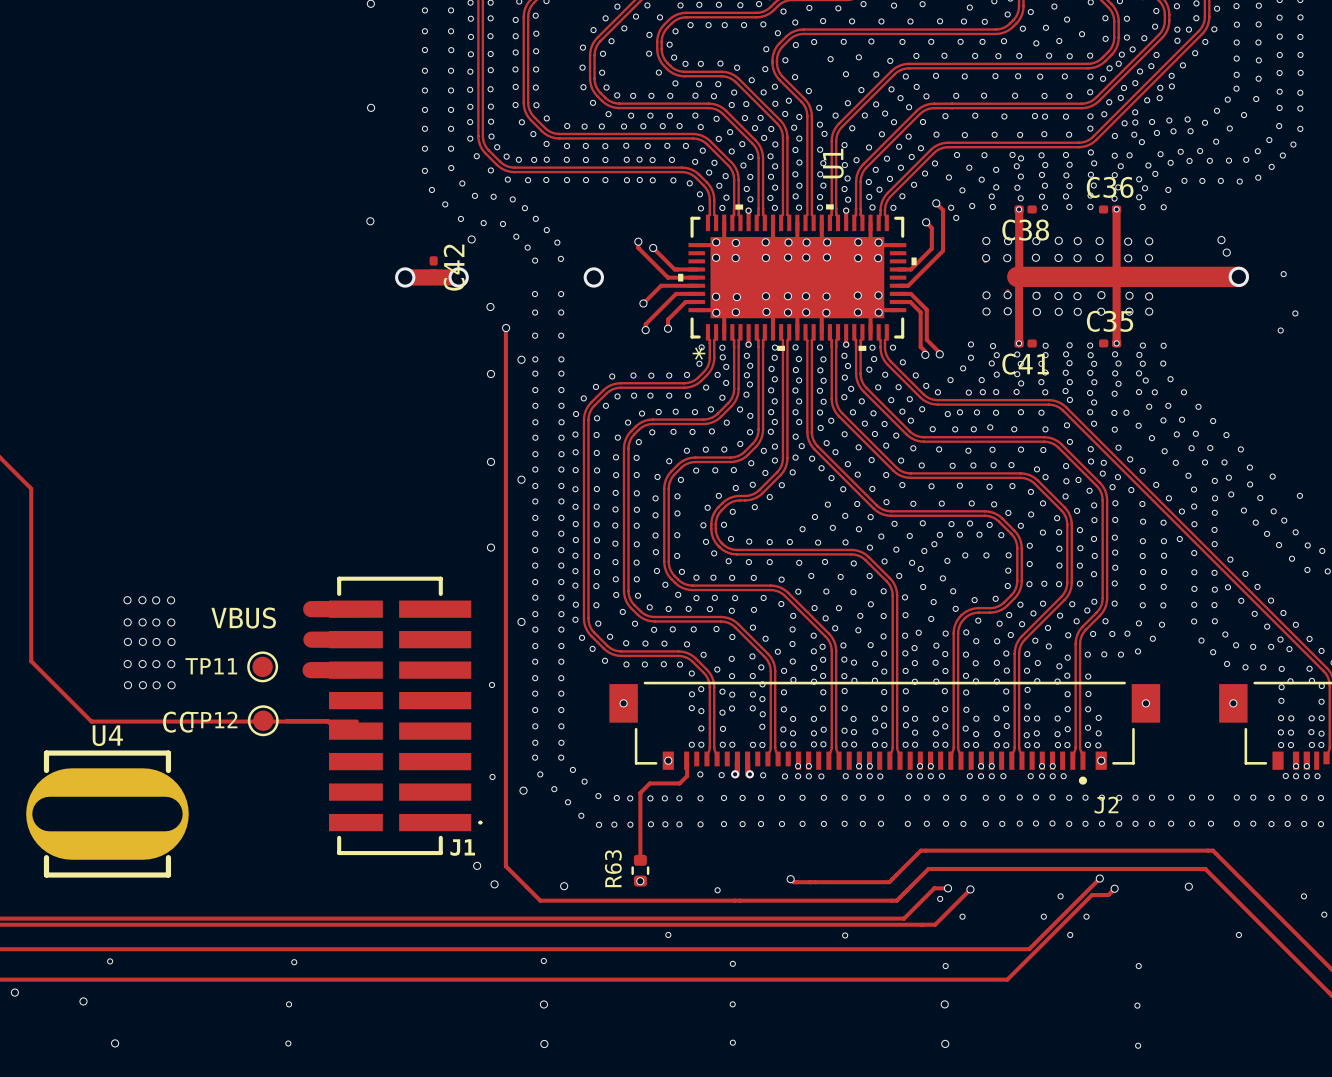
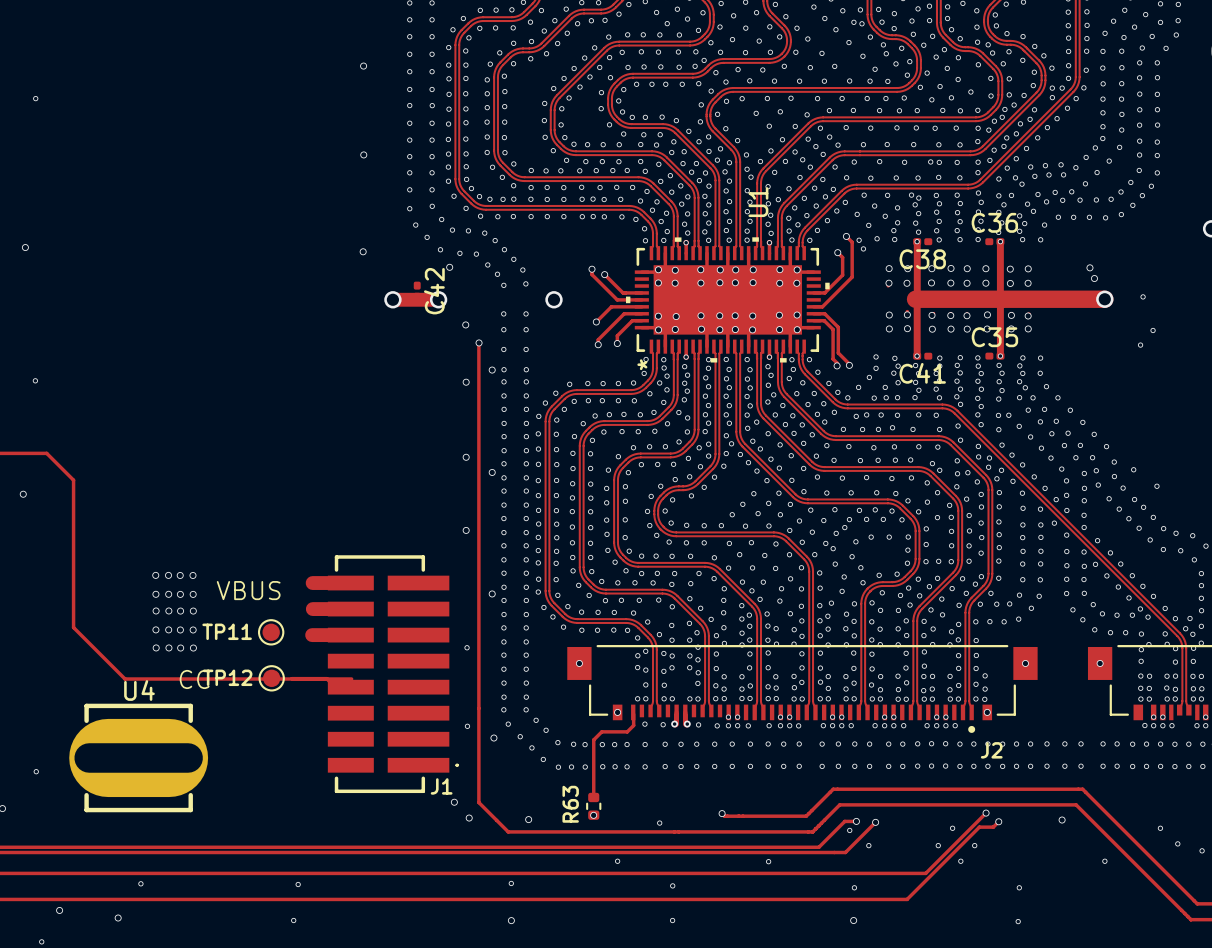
via: (1171, 86) -> none
via: (1159, 98) -> none
via: (1135, 122) -> none

